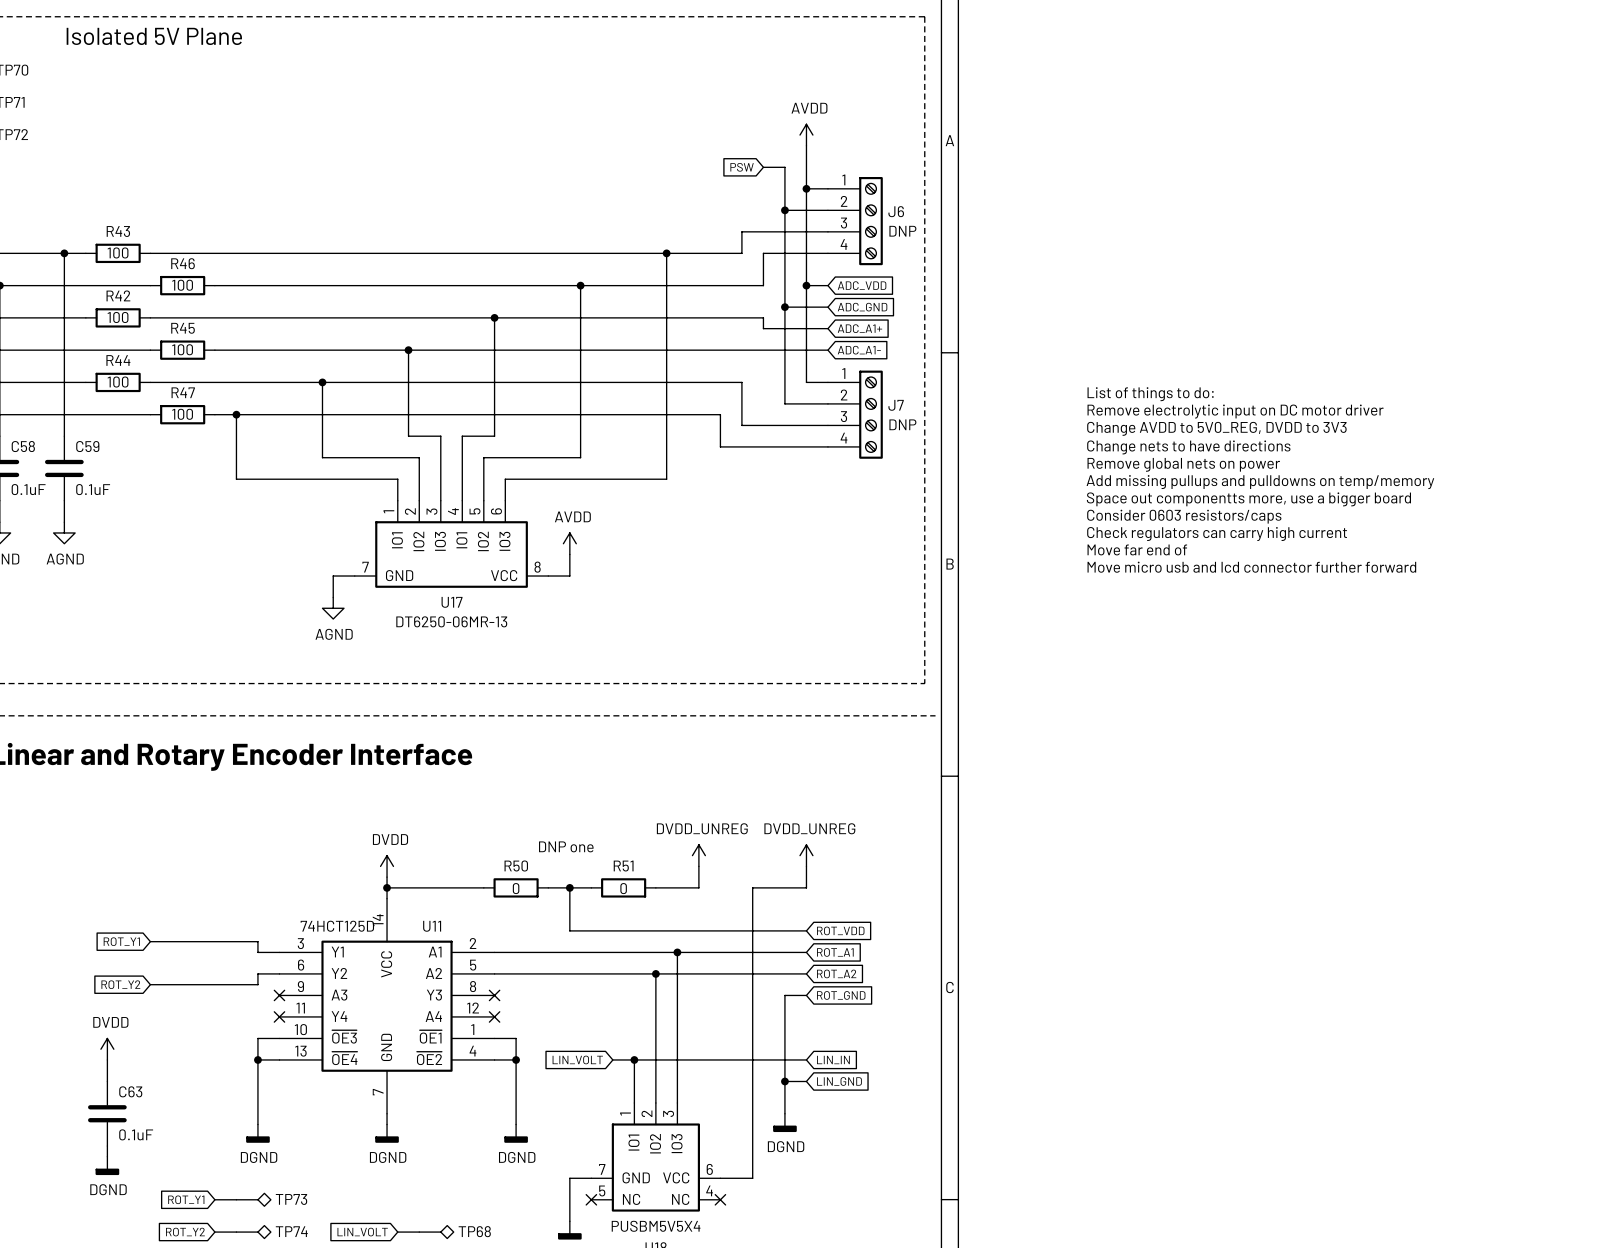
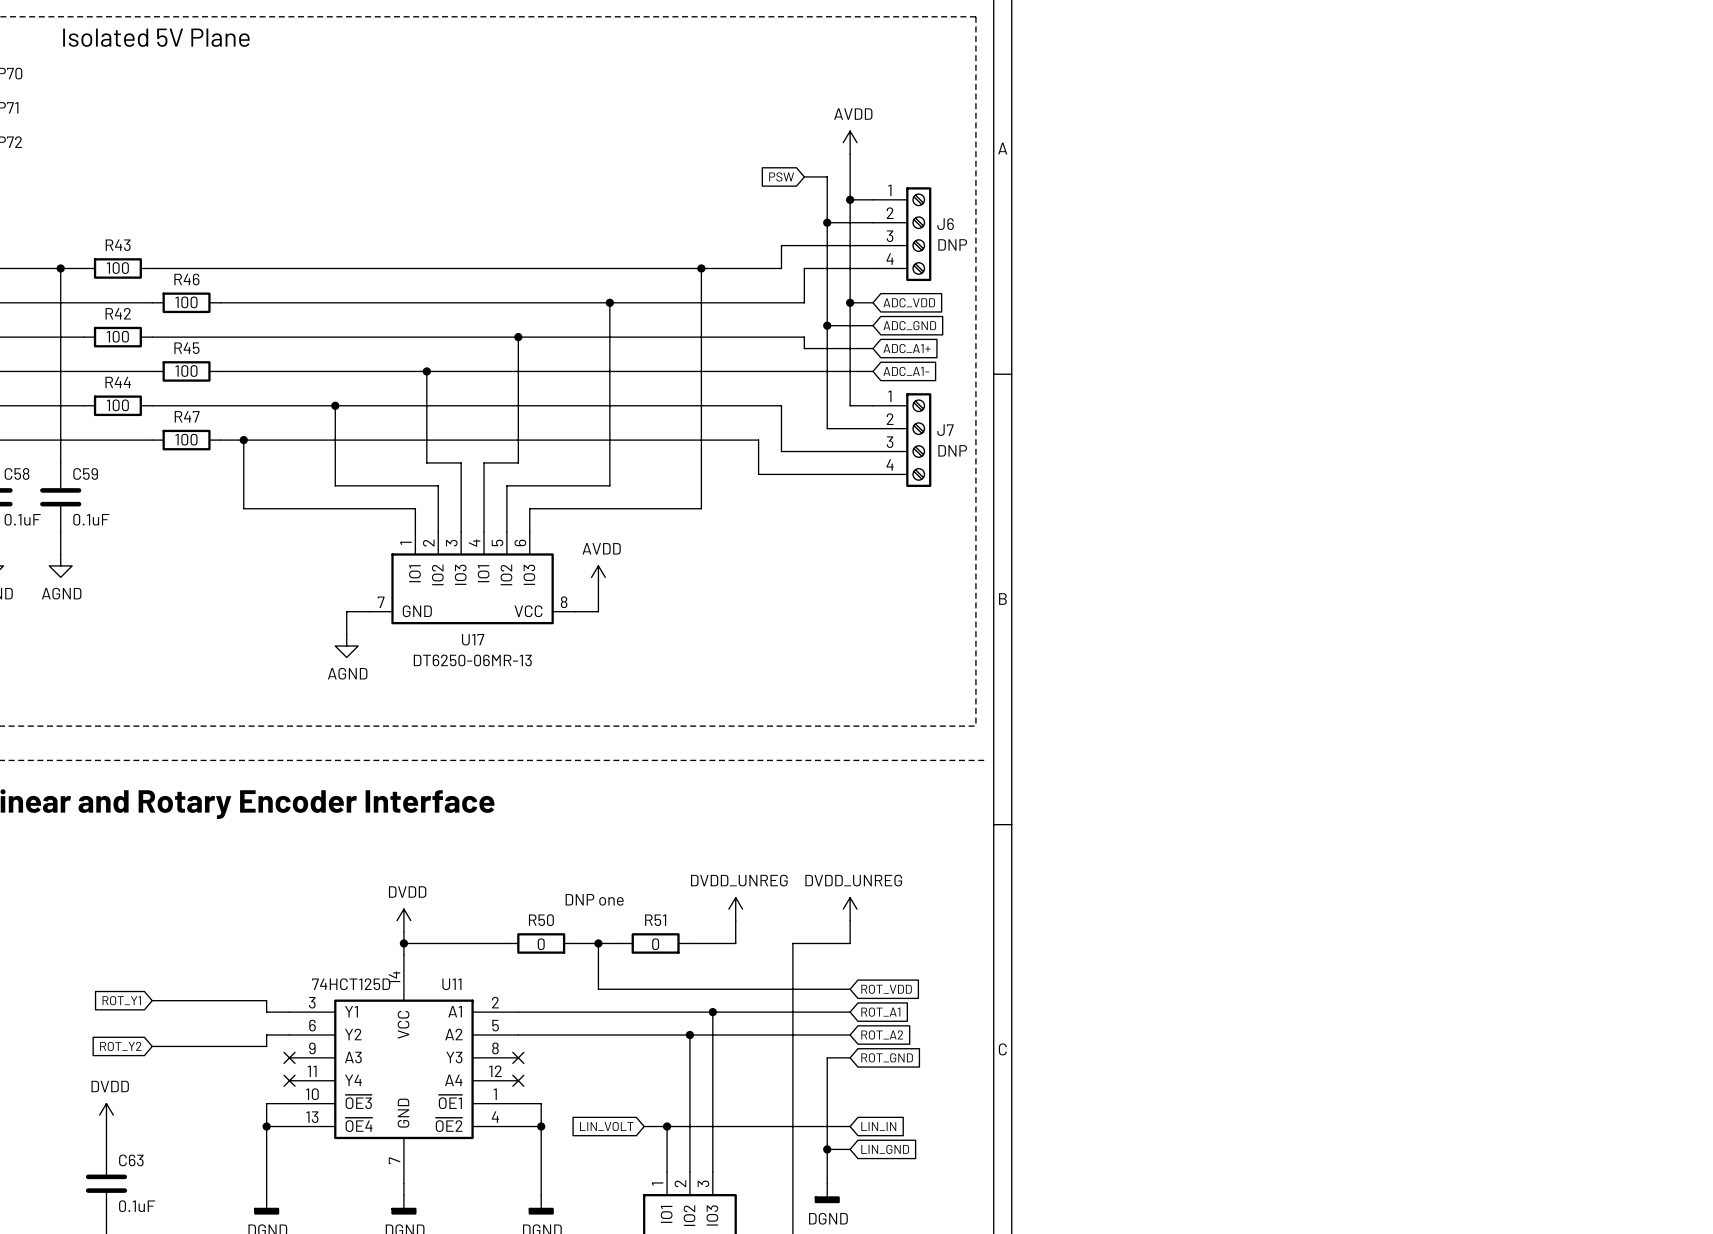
text: List of things to do: (1150, 394) -> none
text: Remove electrolytic input on DC motor driver (1235, 411) -> none
text: Change AVDD to 5V0_REG, DVDD to 3V3 (1216, 428) -> none
text: Change nets to have directions (1188, 447) -> none
text: Remove global nets on power (1183, 464) -> none
text: Add missing pullups and pulldowns on temp/memory (1260, 482) -> none
text: Space out componentts more, use a bigger board (1248, 499) -> none
text: Consider 0603 resistors/caps (1184, 516) -> none
text: Check regulators can carry high current (1217, 534) -> none
text: Move far end of (1137, 549) -> none
text: Move micro usb and lcd connector further forward (1251, 567) -> none

